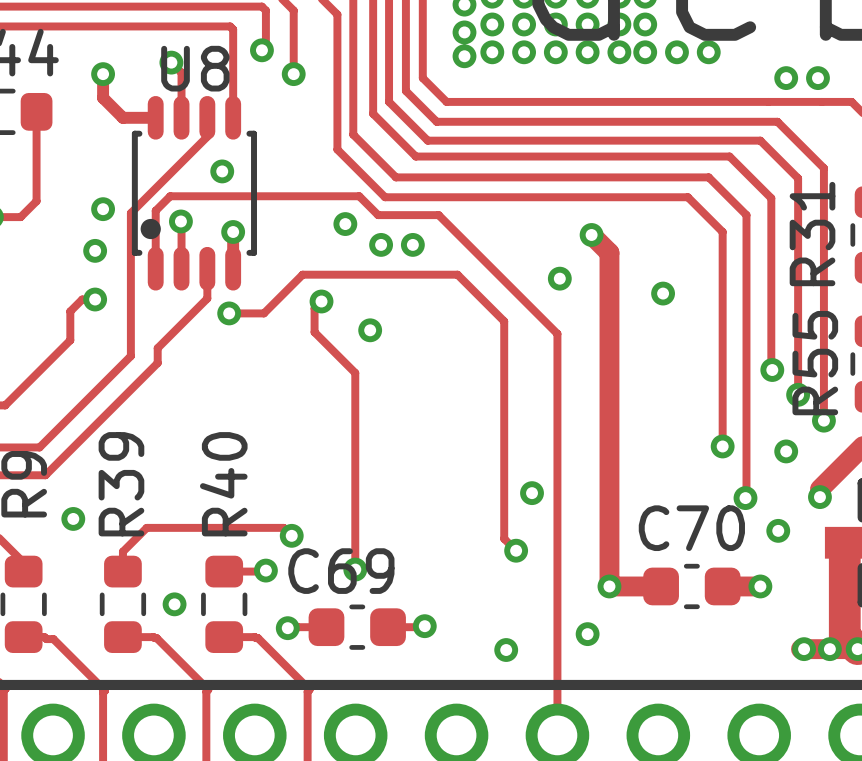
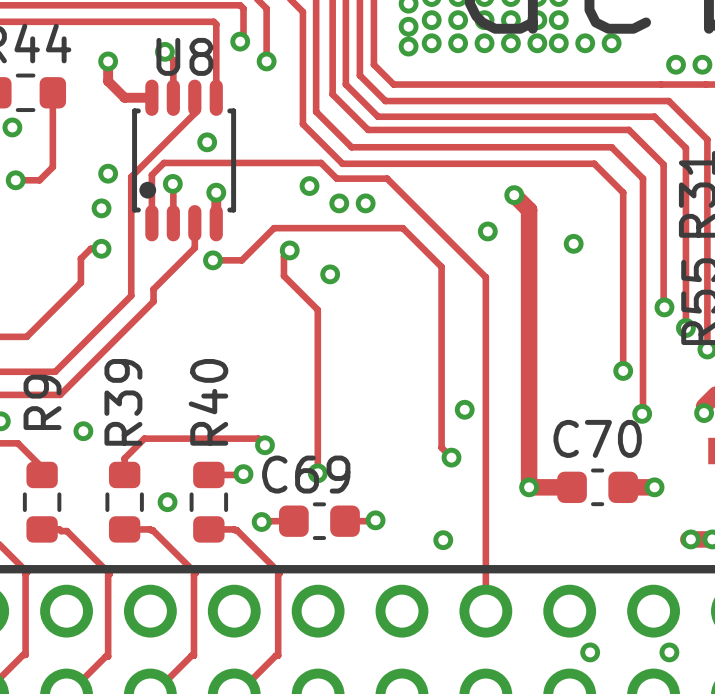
via: (786, 451) -> none
via: (778, 530) -> none
via: (587, 634) -> none

